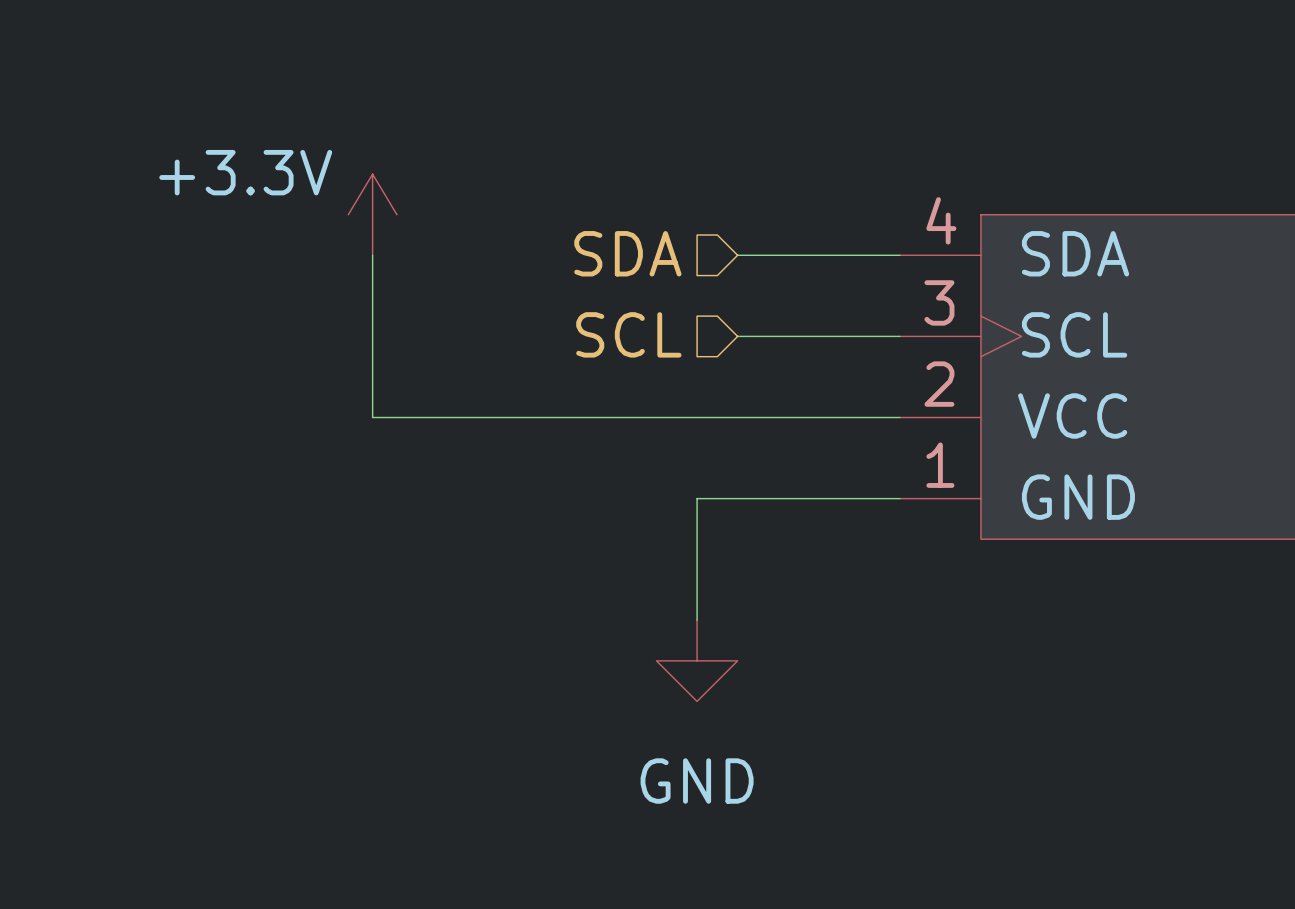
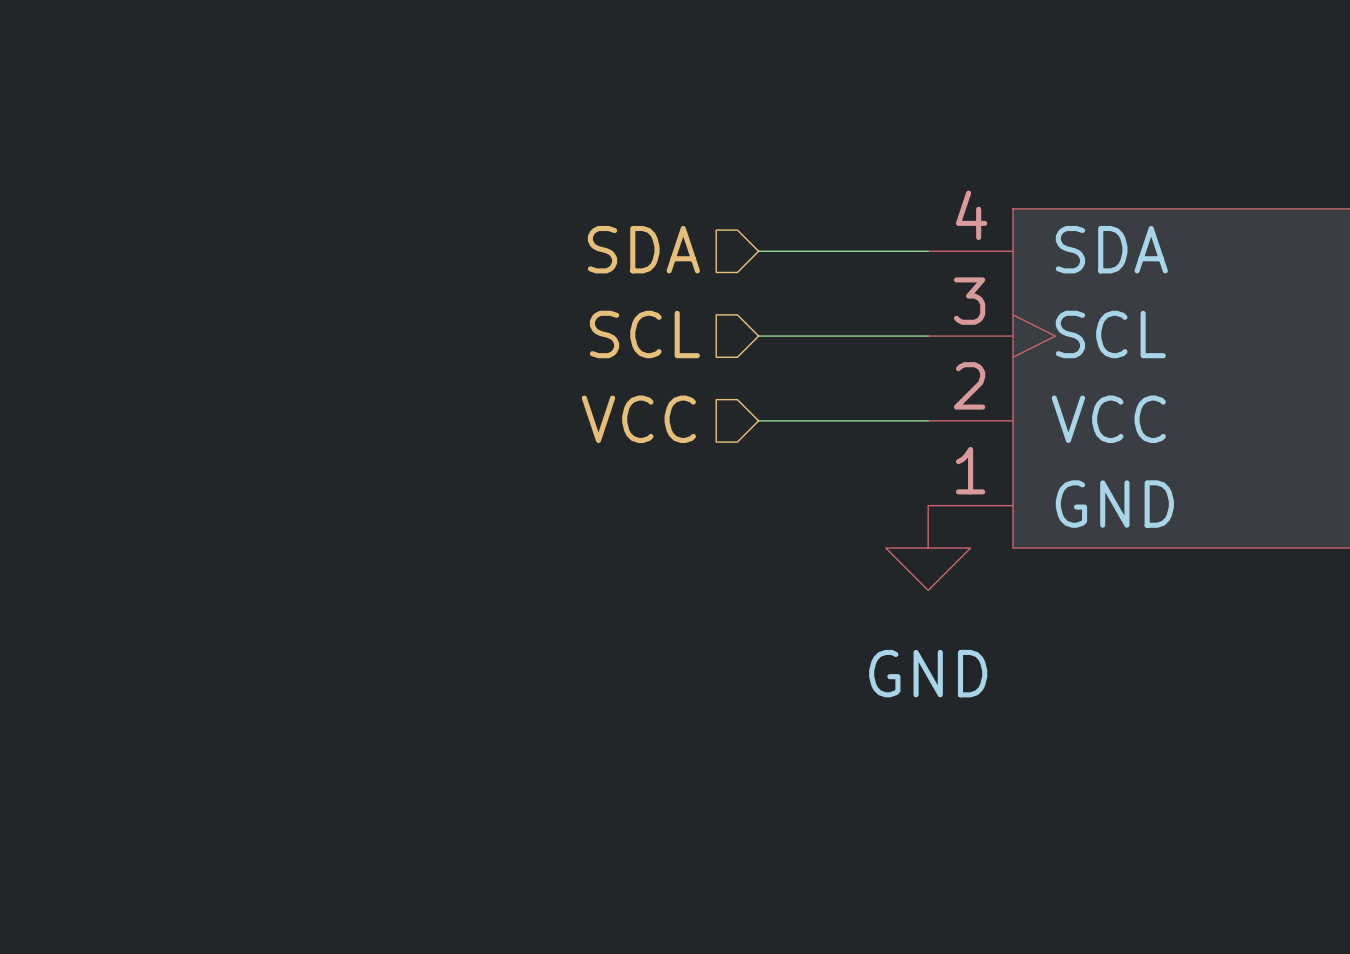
power symbol: +3.3V (372, 214) -> none
wire: (372, 255) (372, 417) (737, 417) -> none
hierarchical label: none -> VCC (638, 419)
wire: (899, 498) (697, 498) (697, 620) -> none
power symbol position: GND (697, 660) -> GND (928, 548)

